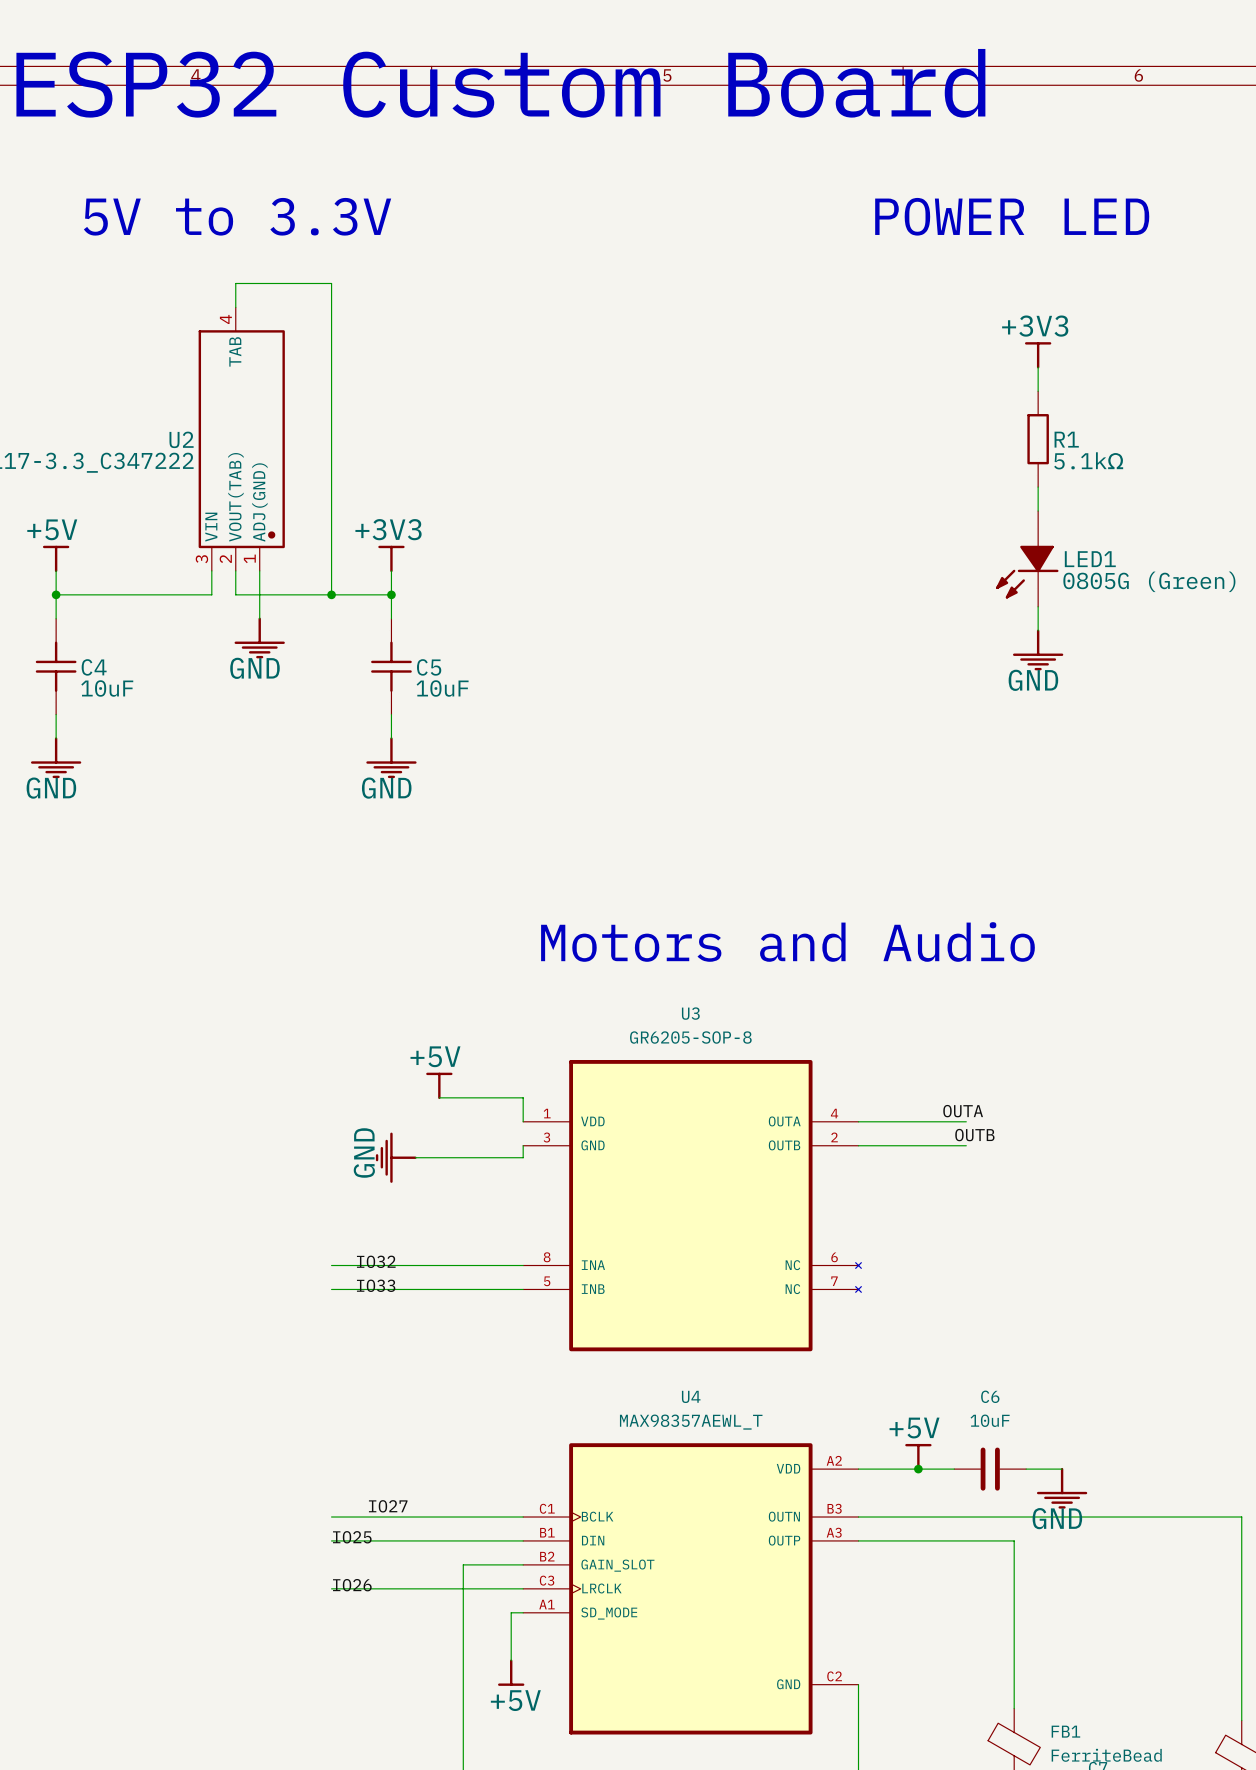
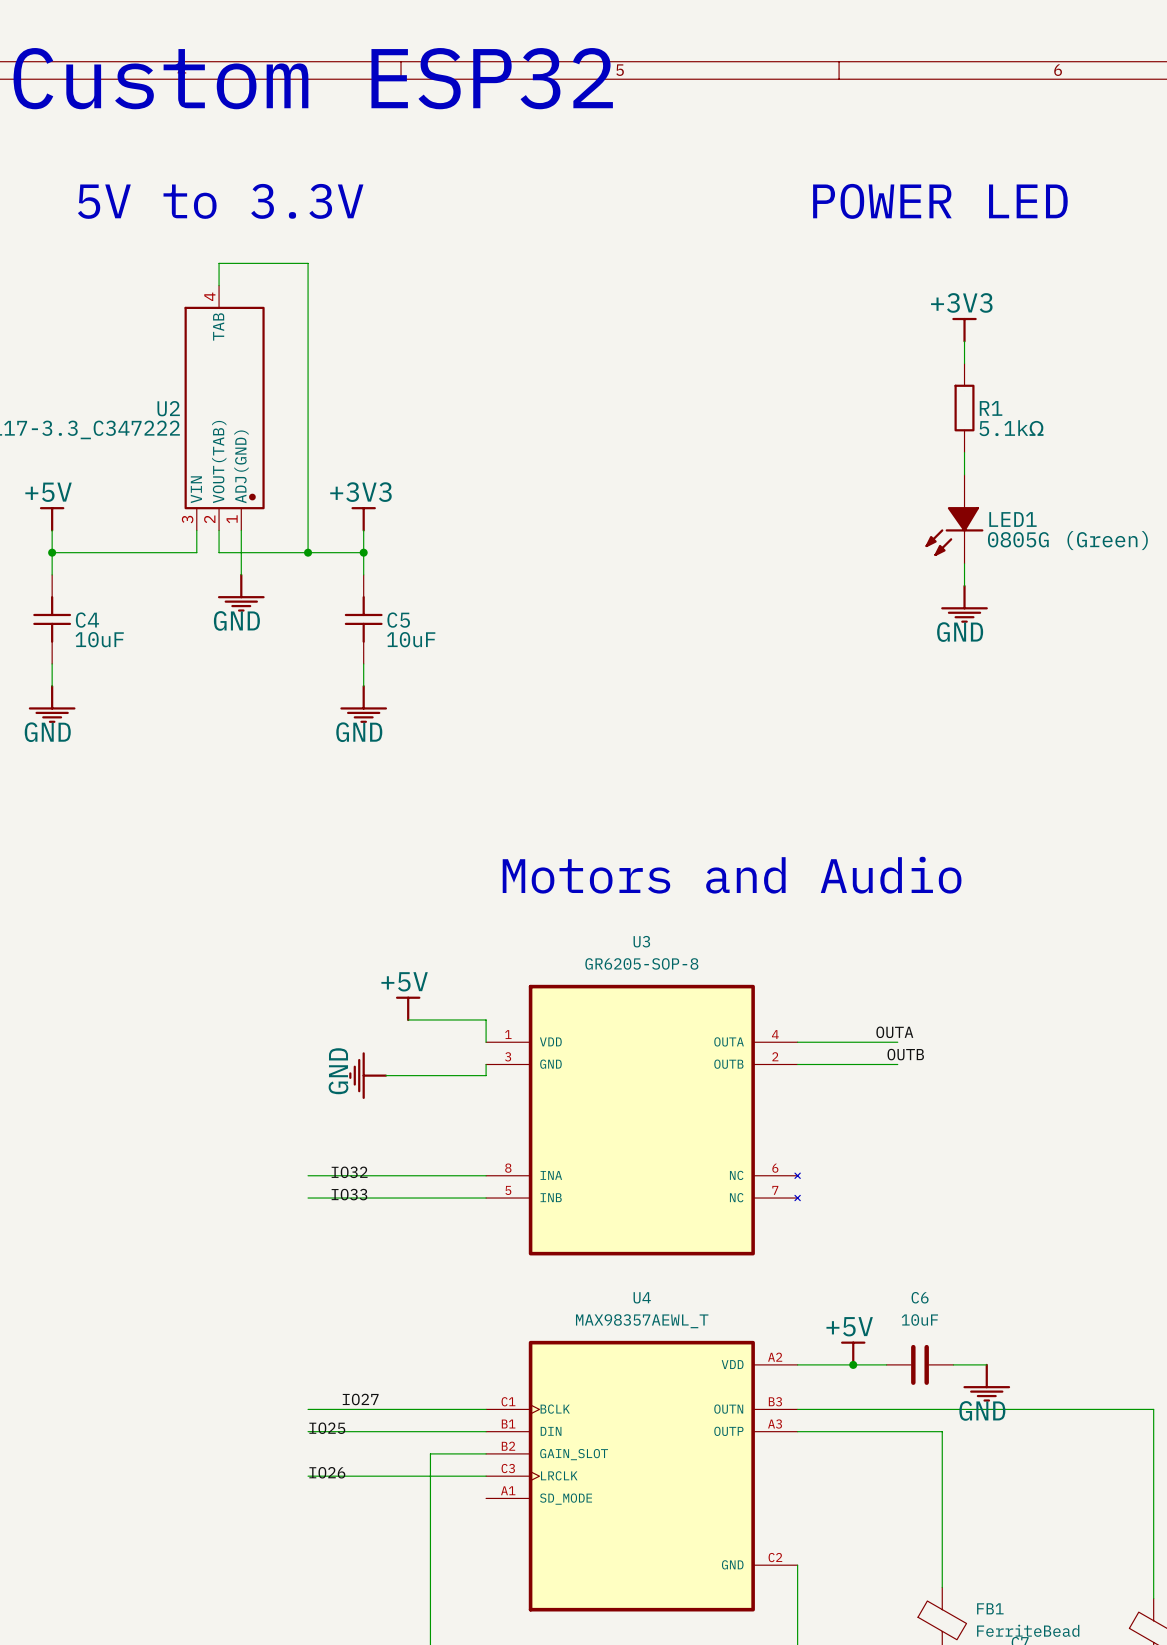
text: ESP32 Custom Board (500, 83) -> Custom ESP32 (313, 78)
wire: (523, 1612) (511, 1612) (511, 1660) -> none
power symbol: +5V (511, 1672) -> none

